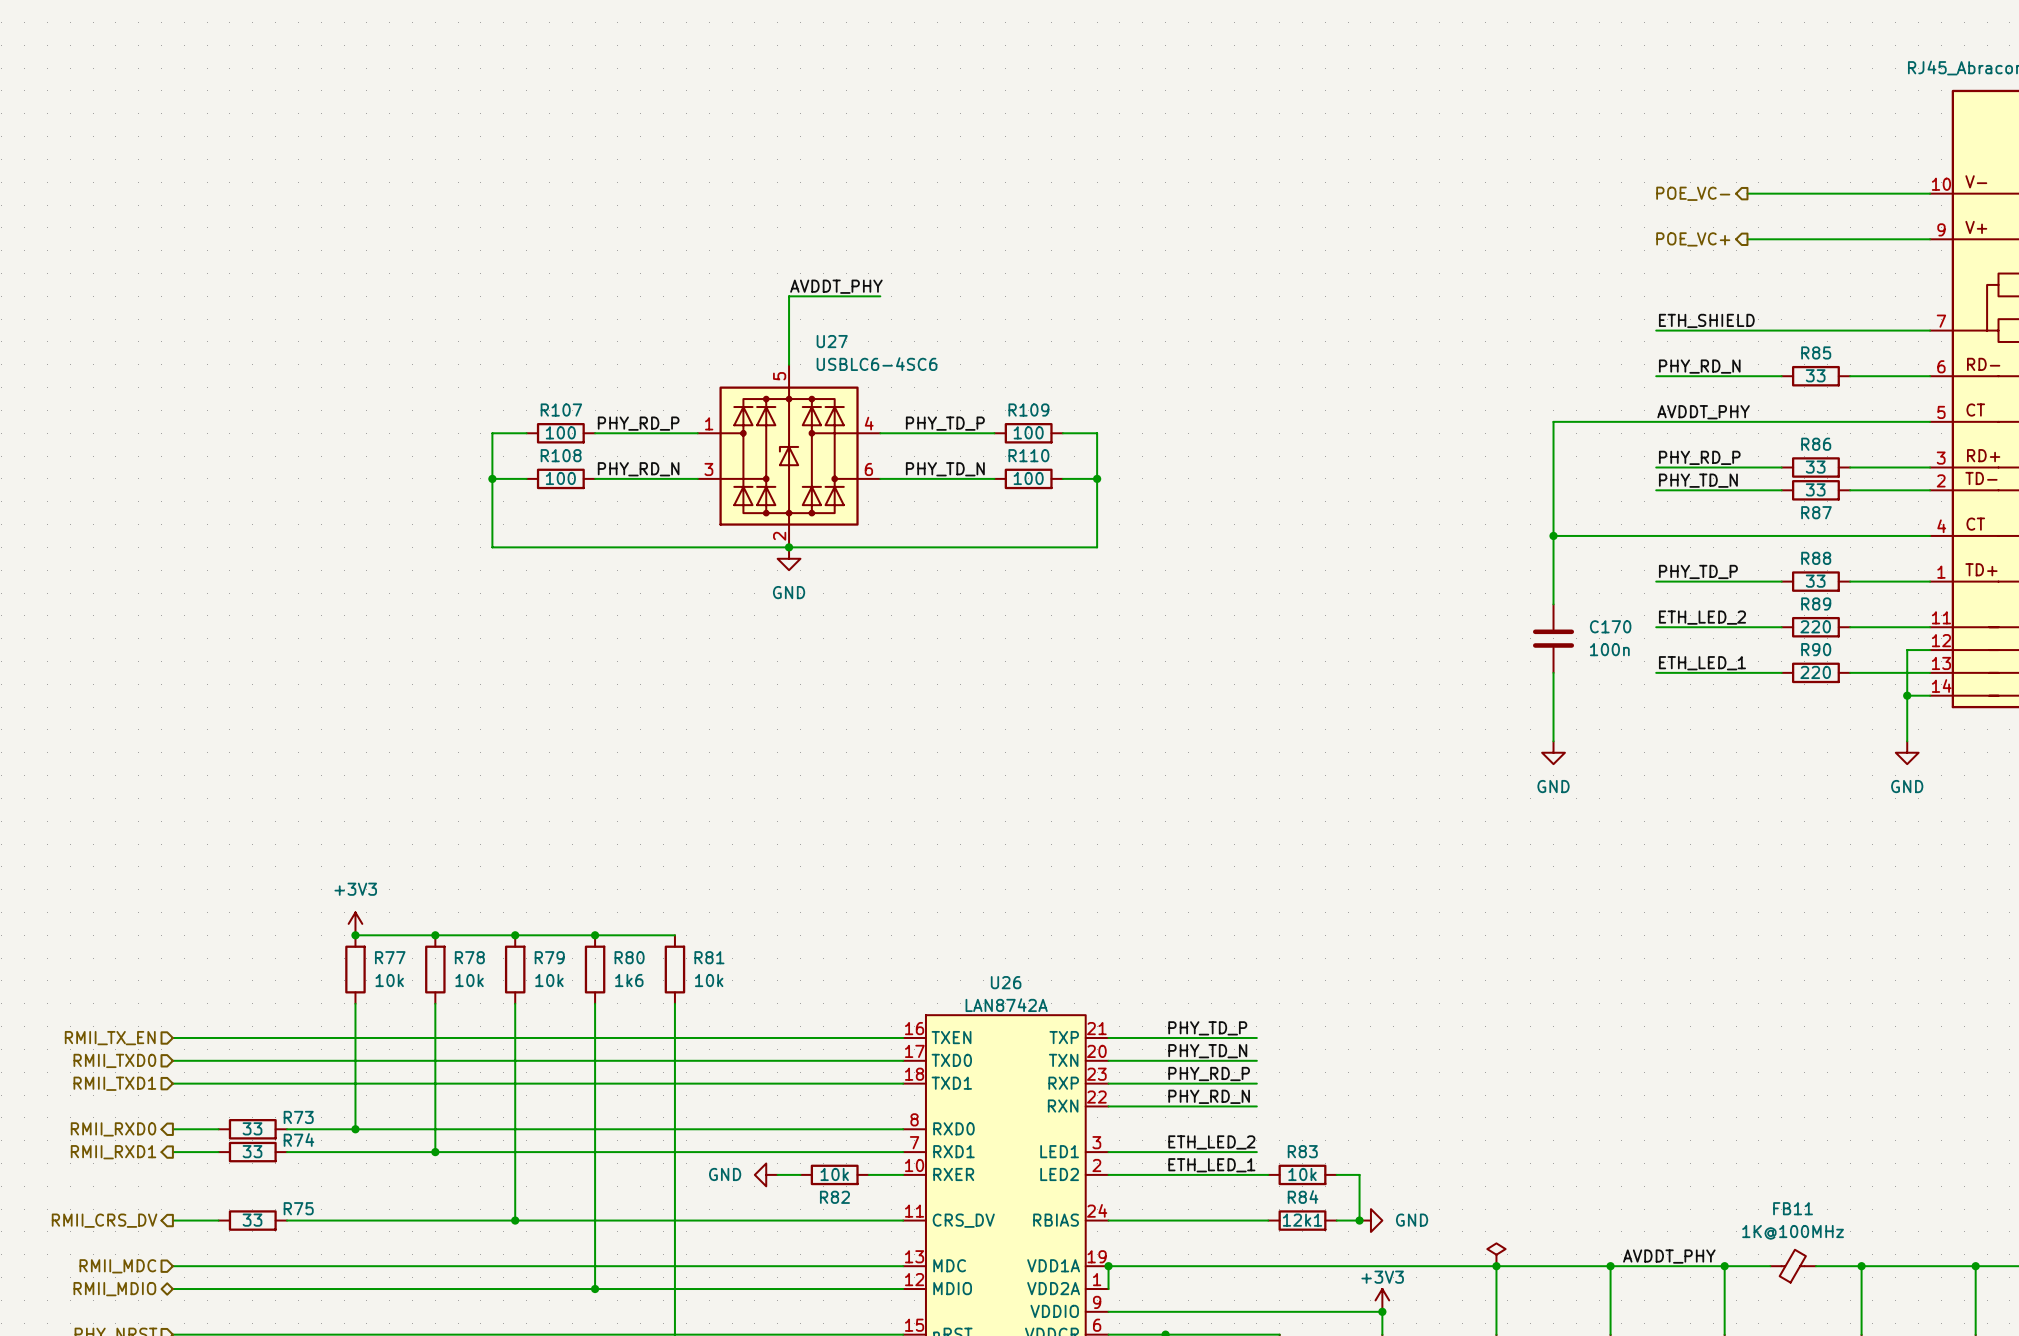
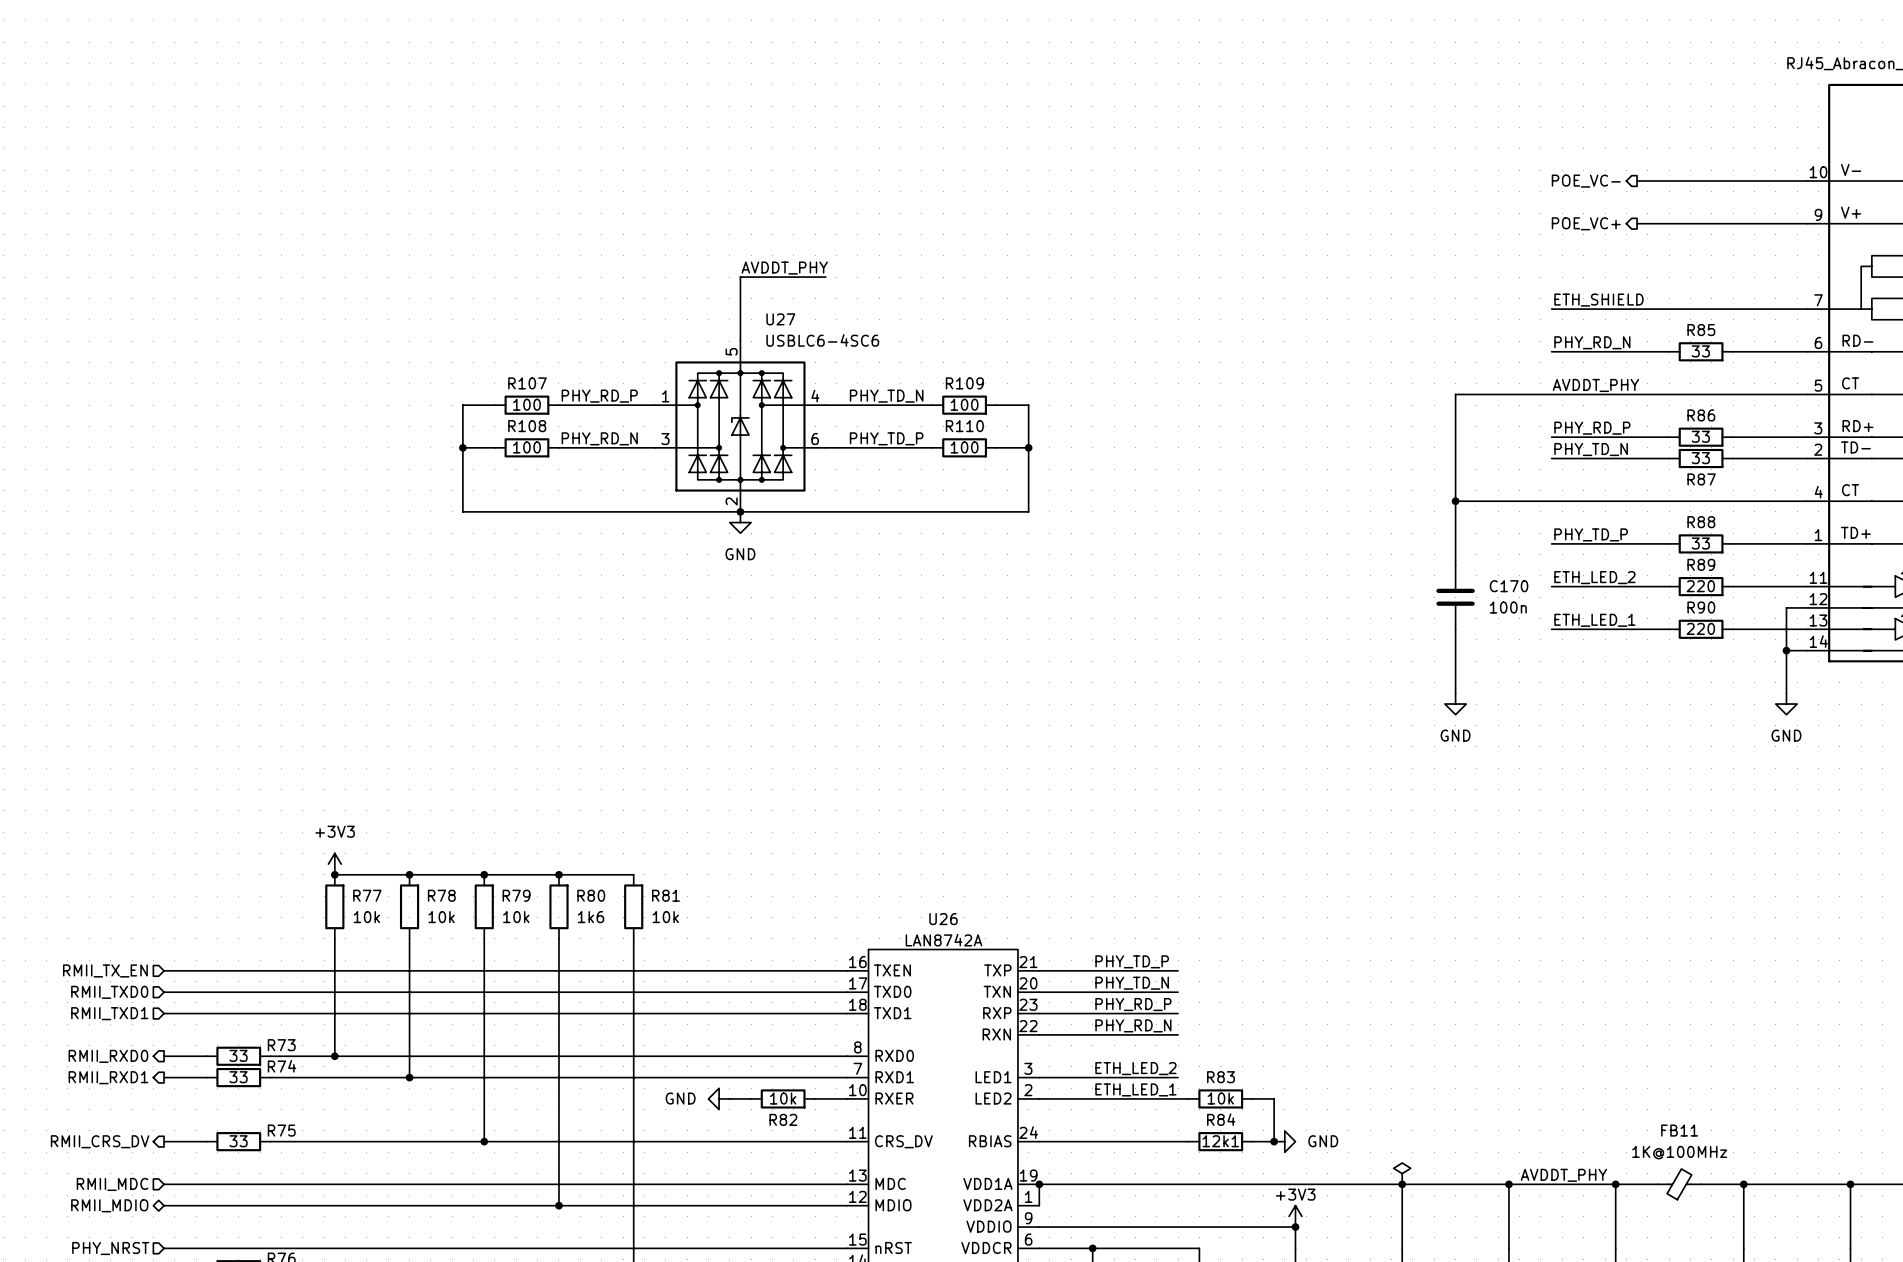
label: PHY_TD_P (945, 423) -> PHY_TD_N (886, 396)
label: PHY_TD_N (945, 469) -> PHY_TD_P (886, 438)

